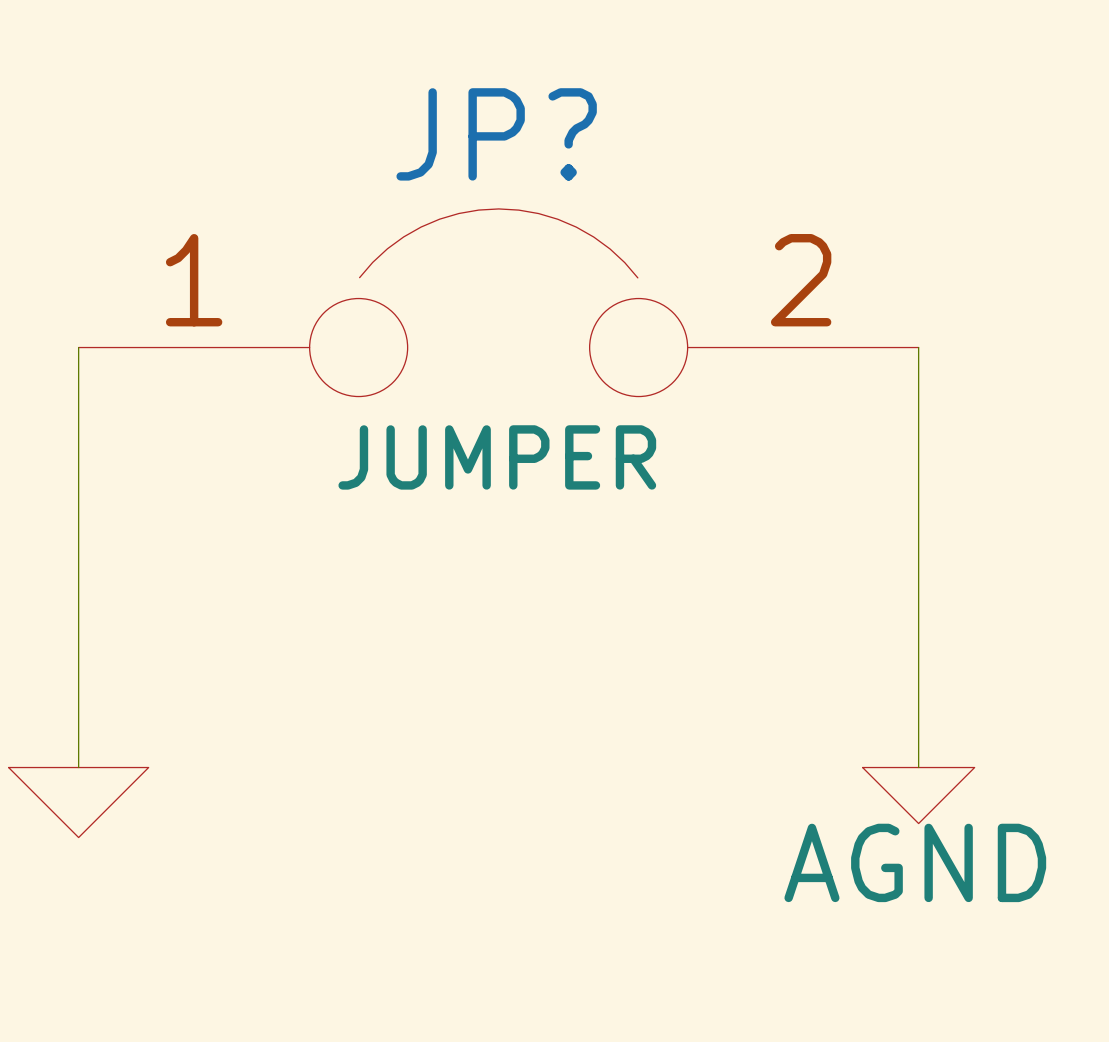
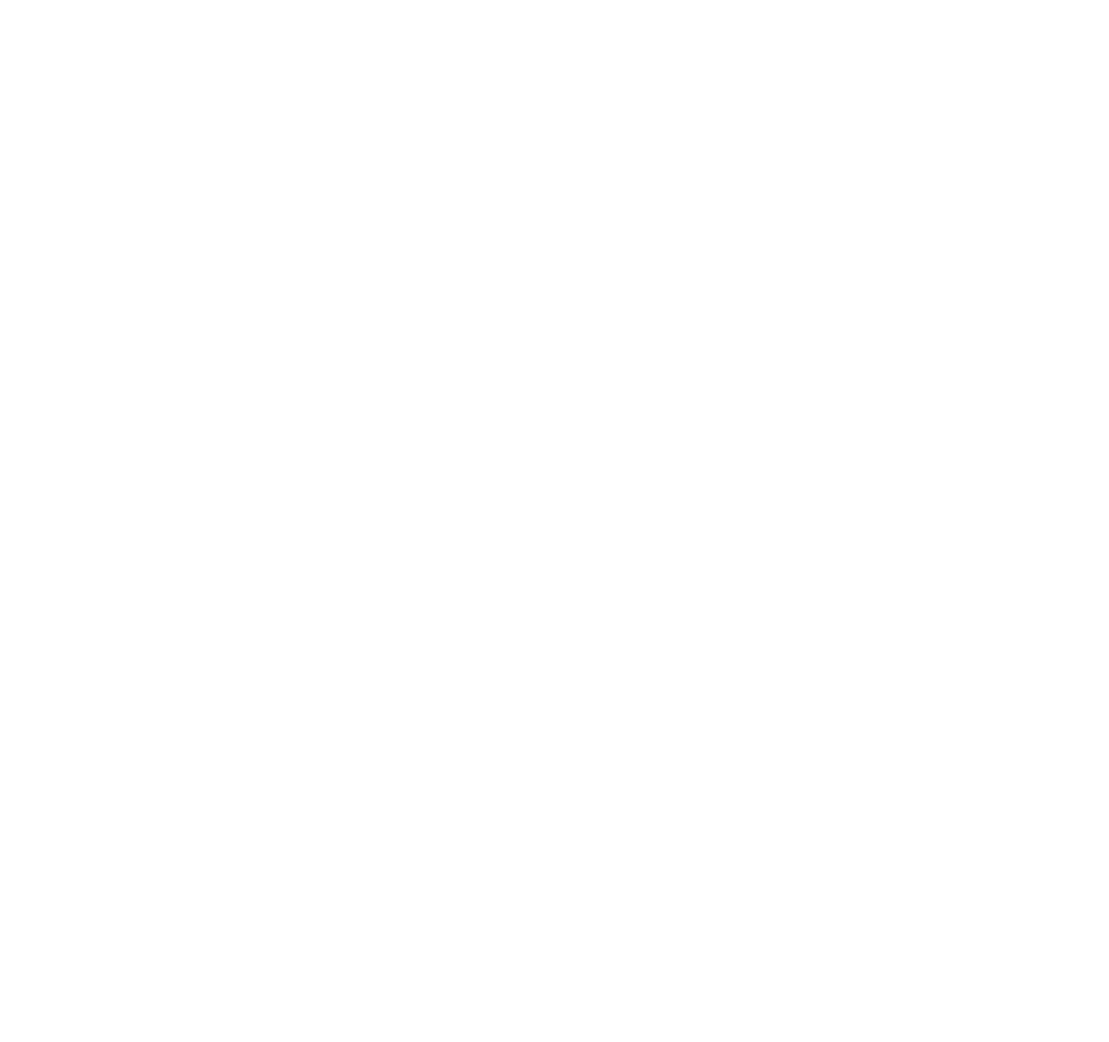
JP?: JUMPER (498, 302) -> none
wire: (78, 347) (78, 767) -> none
wire: (918, 347) (918, 767) -> none
power symbol: AGND (918, 795) -> none
power symbol: (78, 802) -> none

